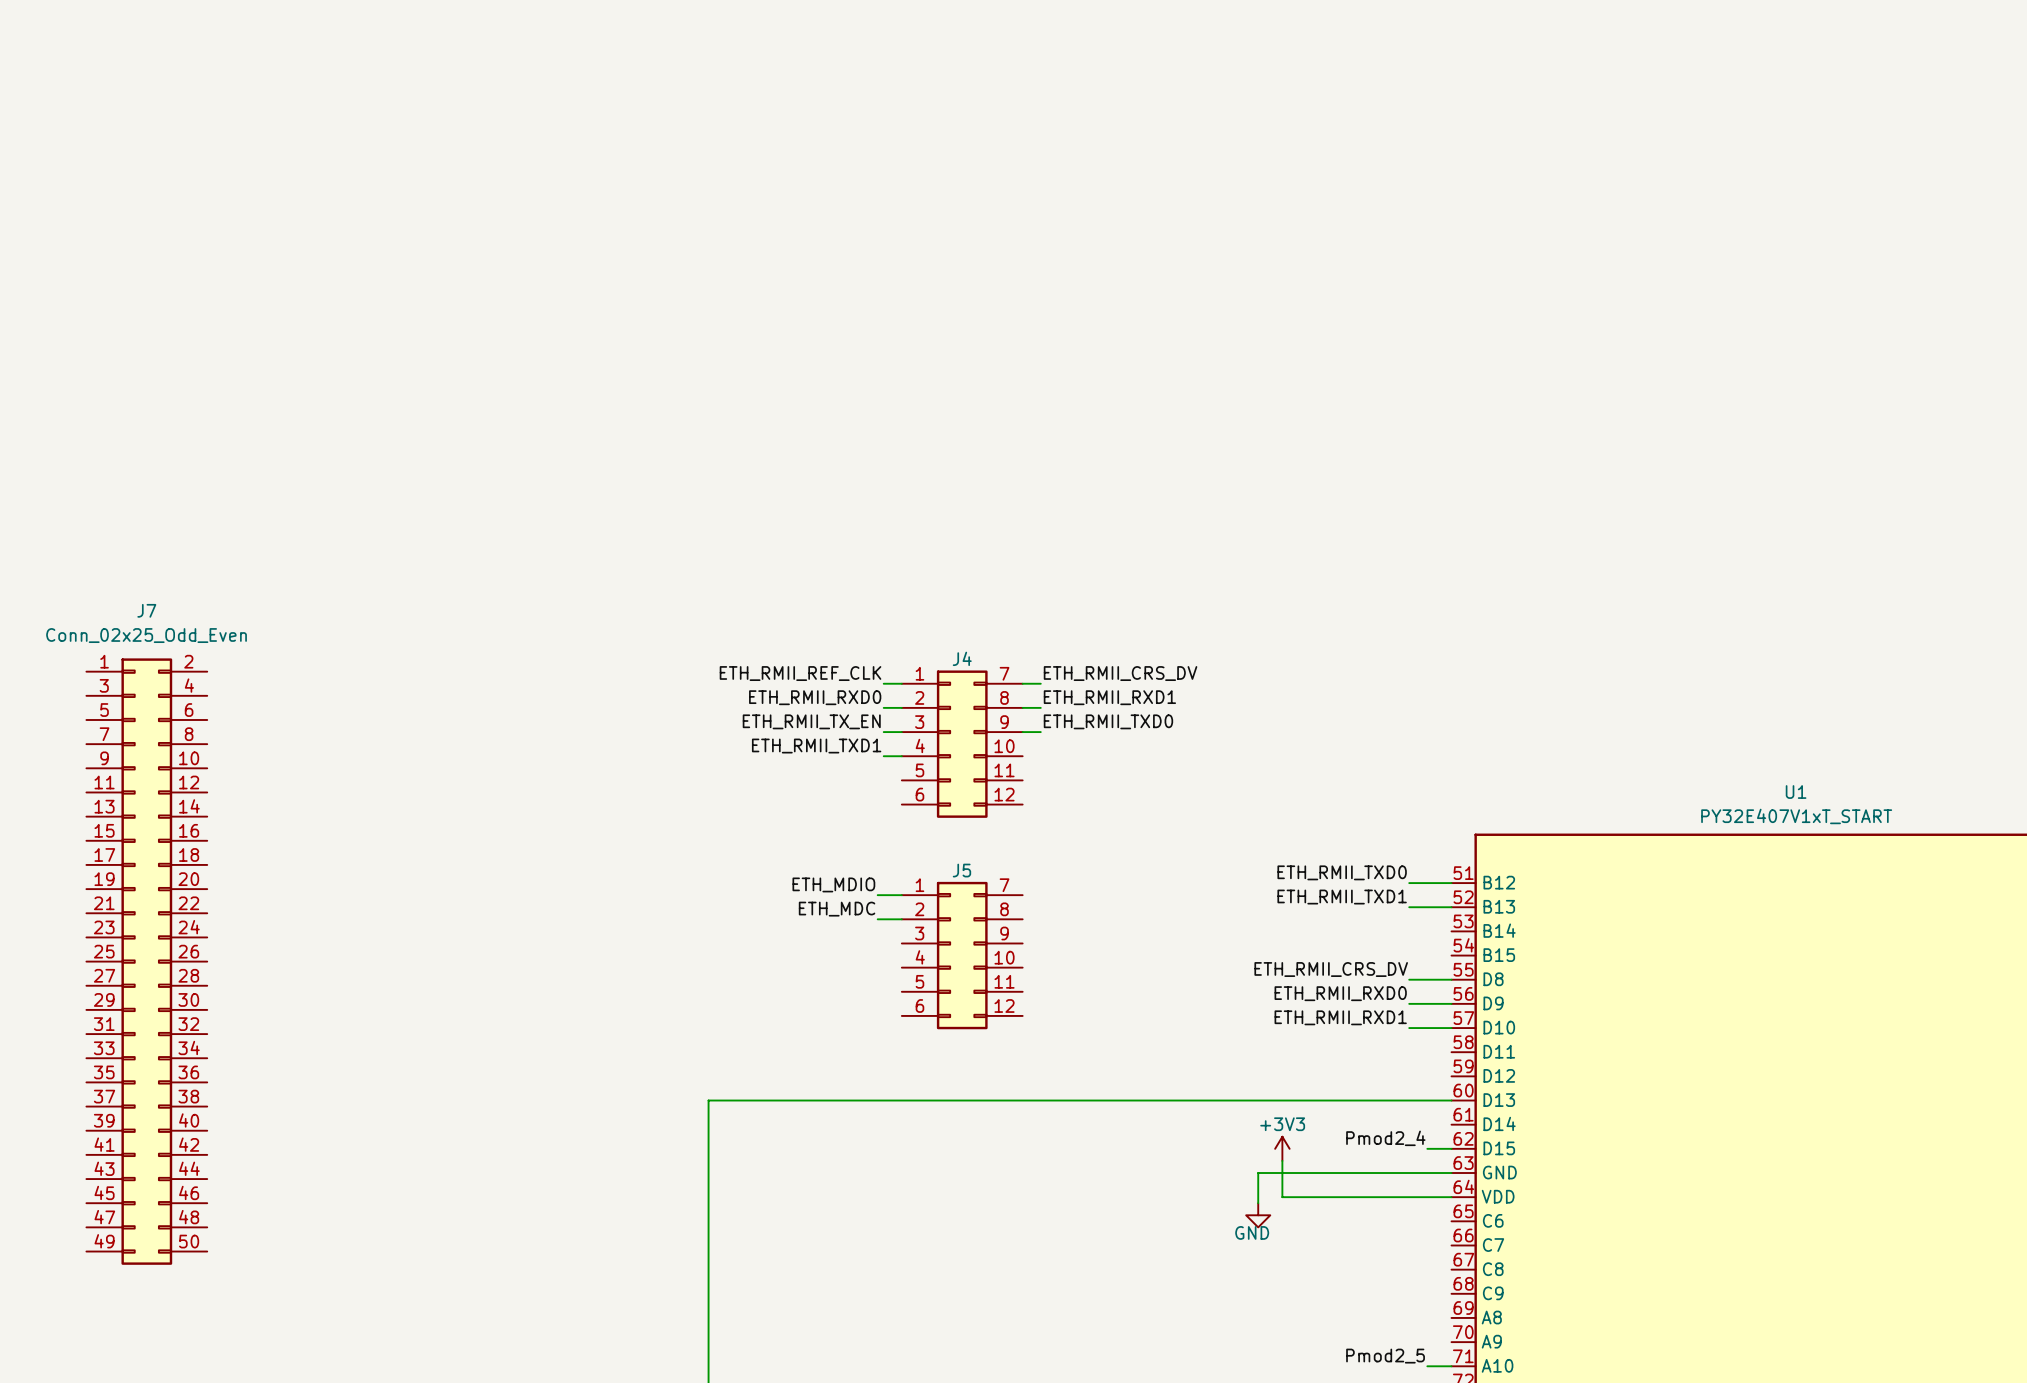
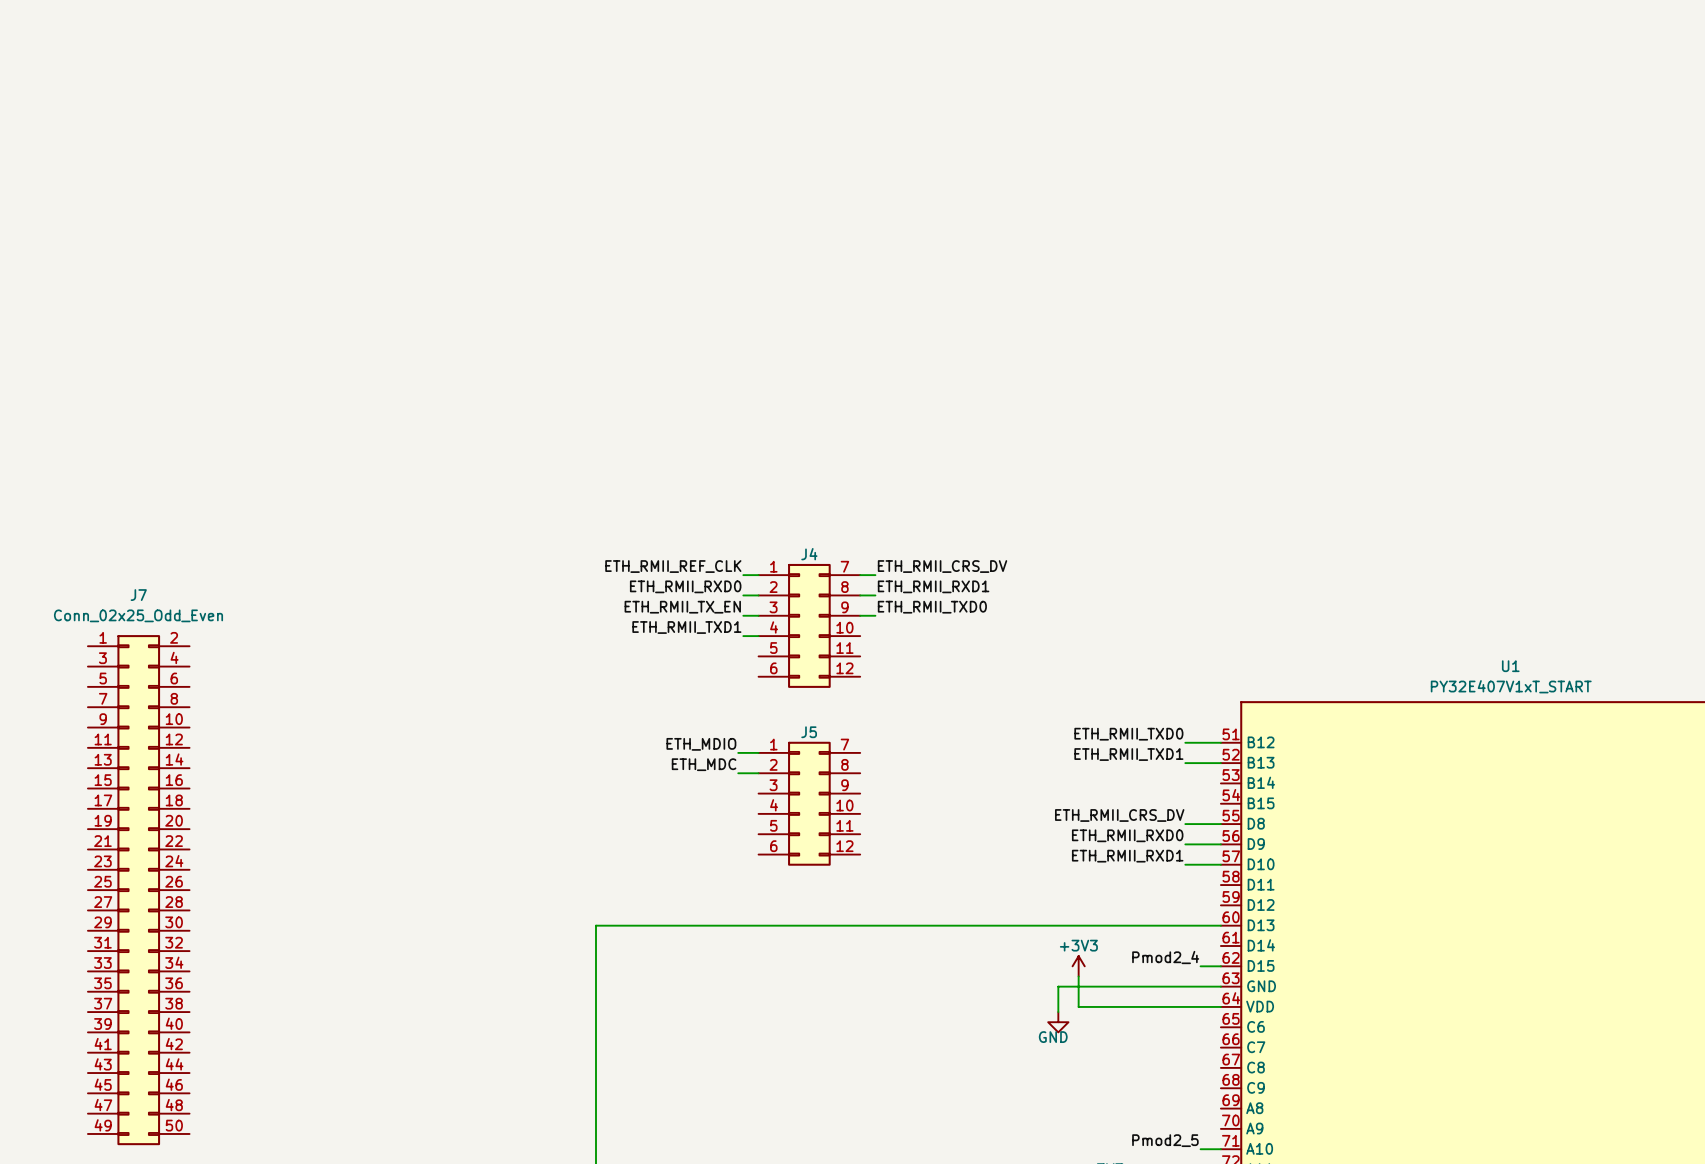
J7 position: (146, 961) -> (138, 890)

